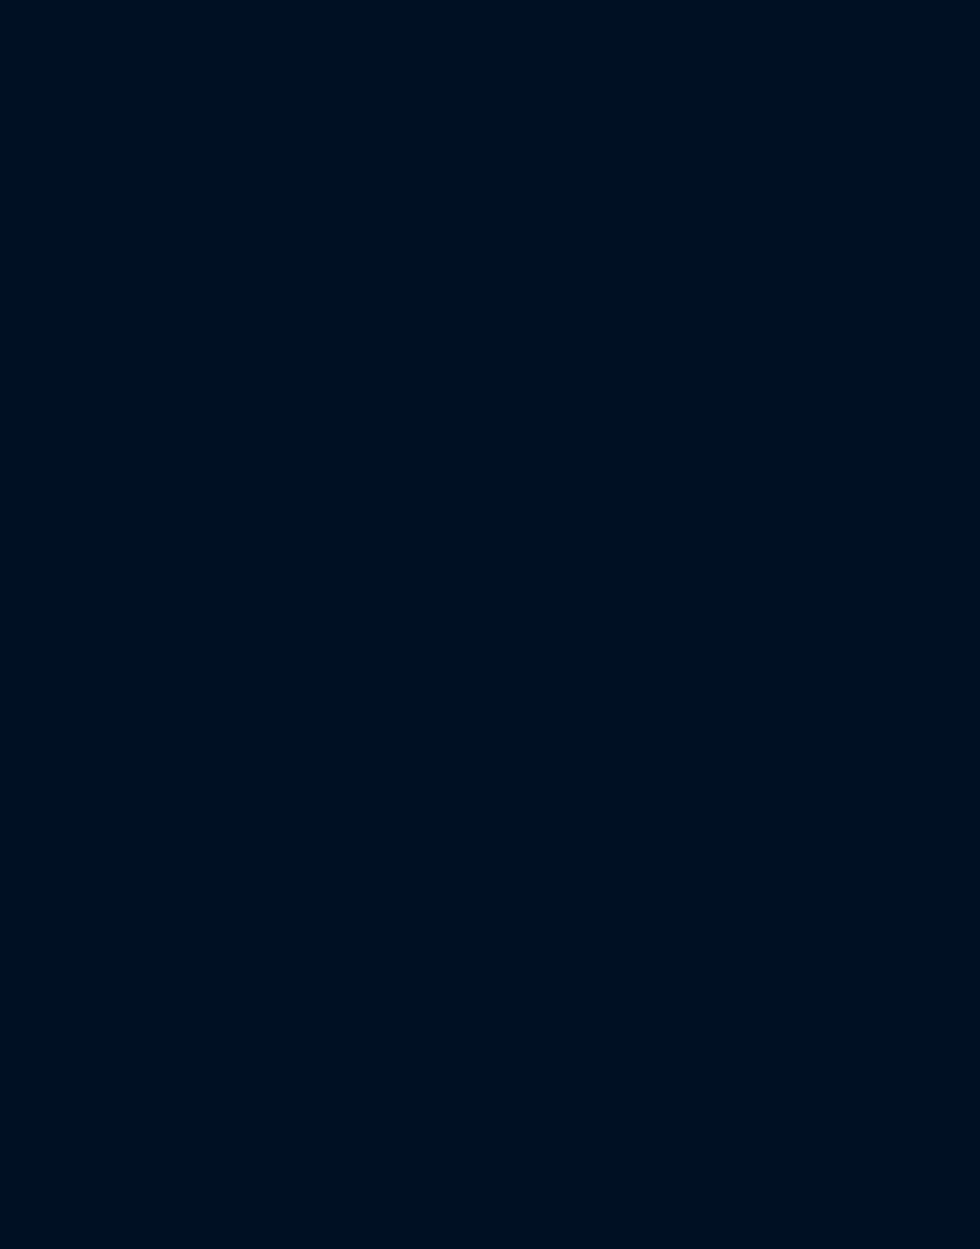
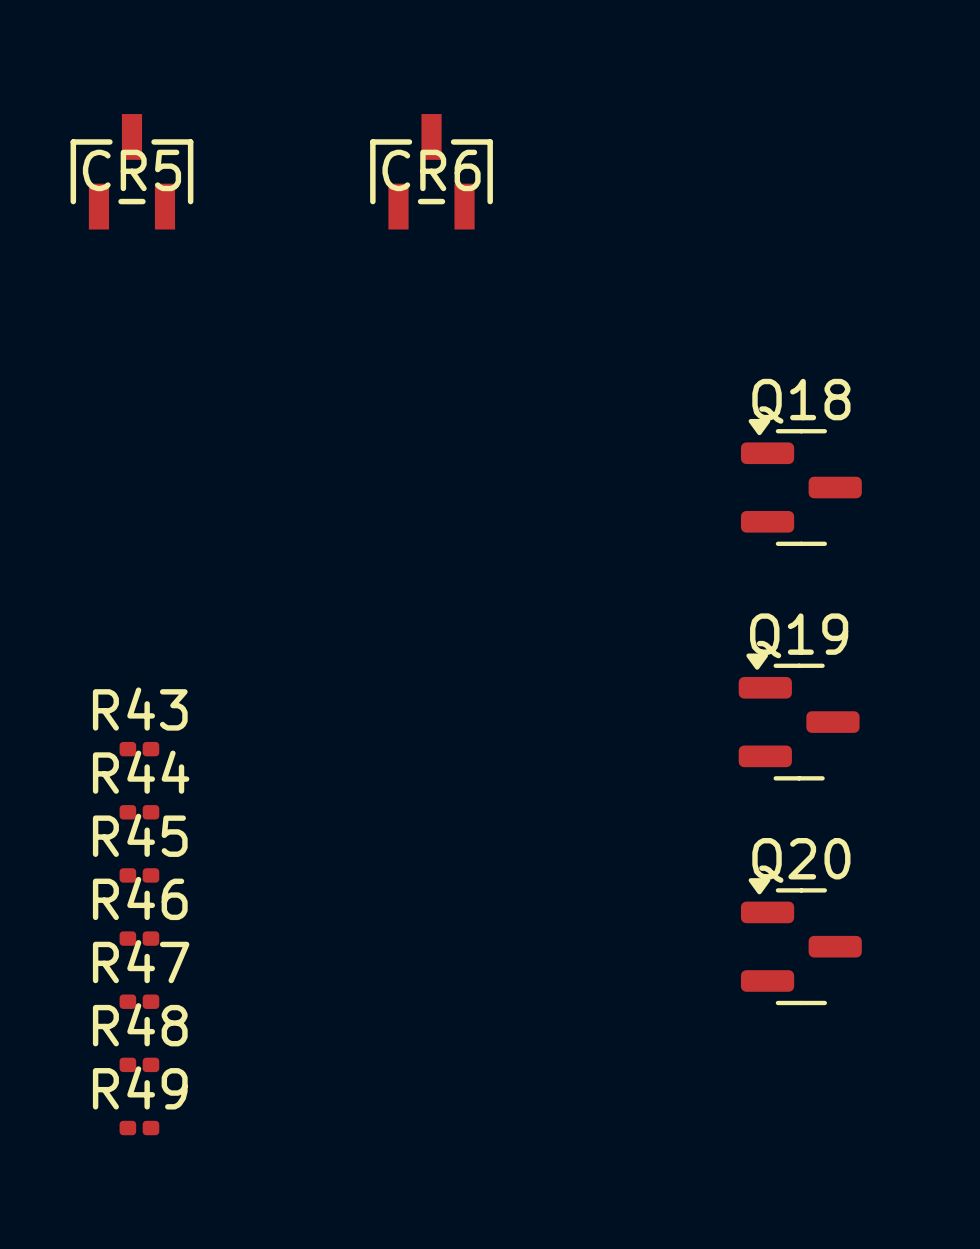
CR5: none -> (131, 171)
CR6: none -> (431, 171)
Q18: none -> (801, 482)
Q19: none -> (799, 717)
R43: none -> (139, 749)
R44: none -> (139, 812)
R45: none -> (139, 875)
R46: none -> (139, 938)
Q20: none -> (801, 941)
R47: none -> (139, 1001)
R48: none -> (139, 1064)
R49: none -> (139, 1128)

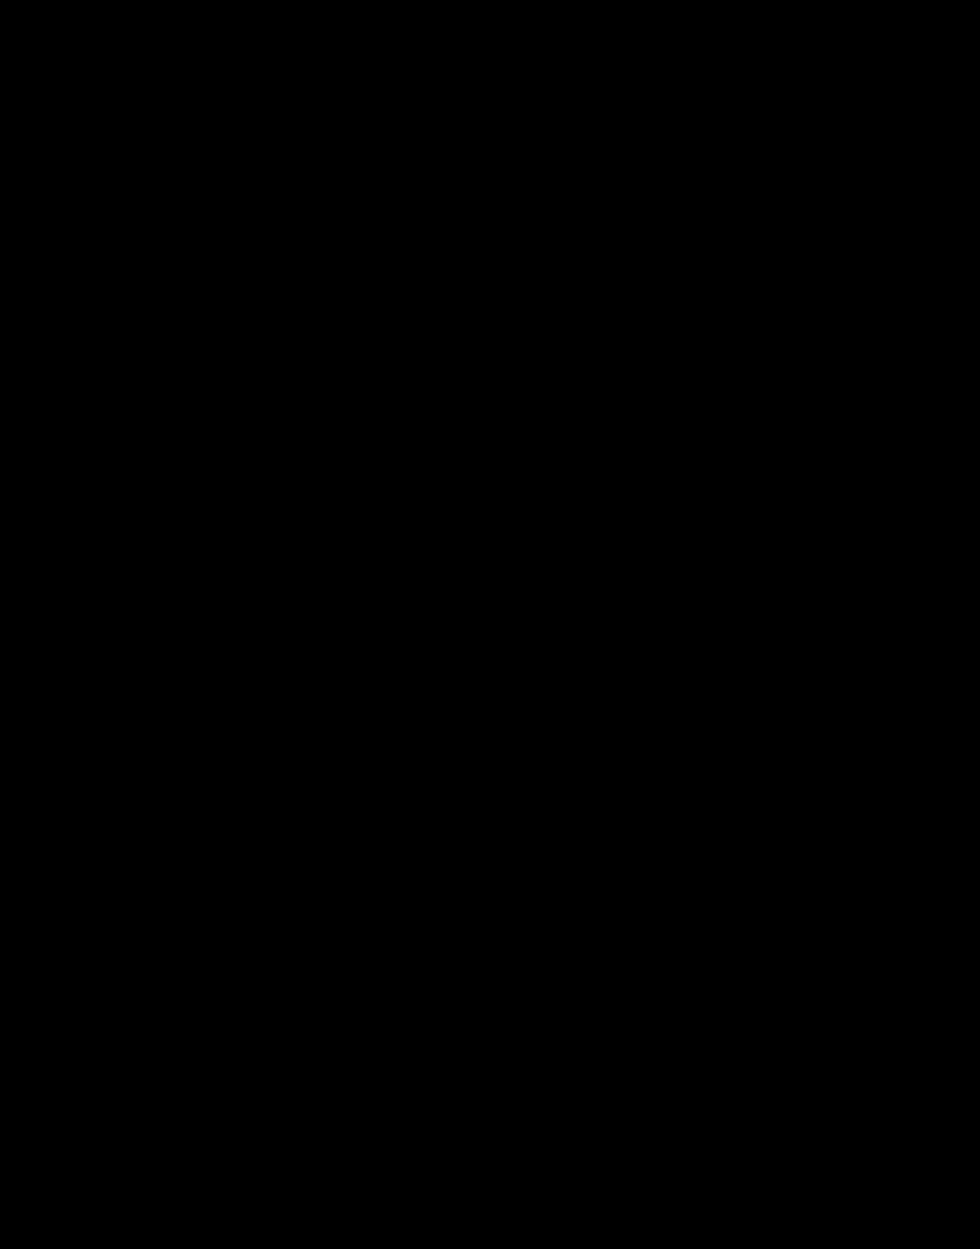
CR5: (131, 171) -> none
CR6: (431, 171) -> none
Q18: (801, 482) -> none
Q19: (799, 717) -> none
R43: (139, 749) -> none
R44: (139, 812) -> none
R45: (139, 875) -> none
R46: (139, 938) -> none
Q20: (801, 941) -> none
R47: (139, 1001) -> none
R48: (139, 1064) -> none
R49: (139, 1128) -> none

